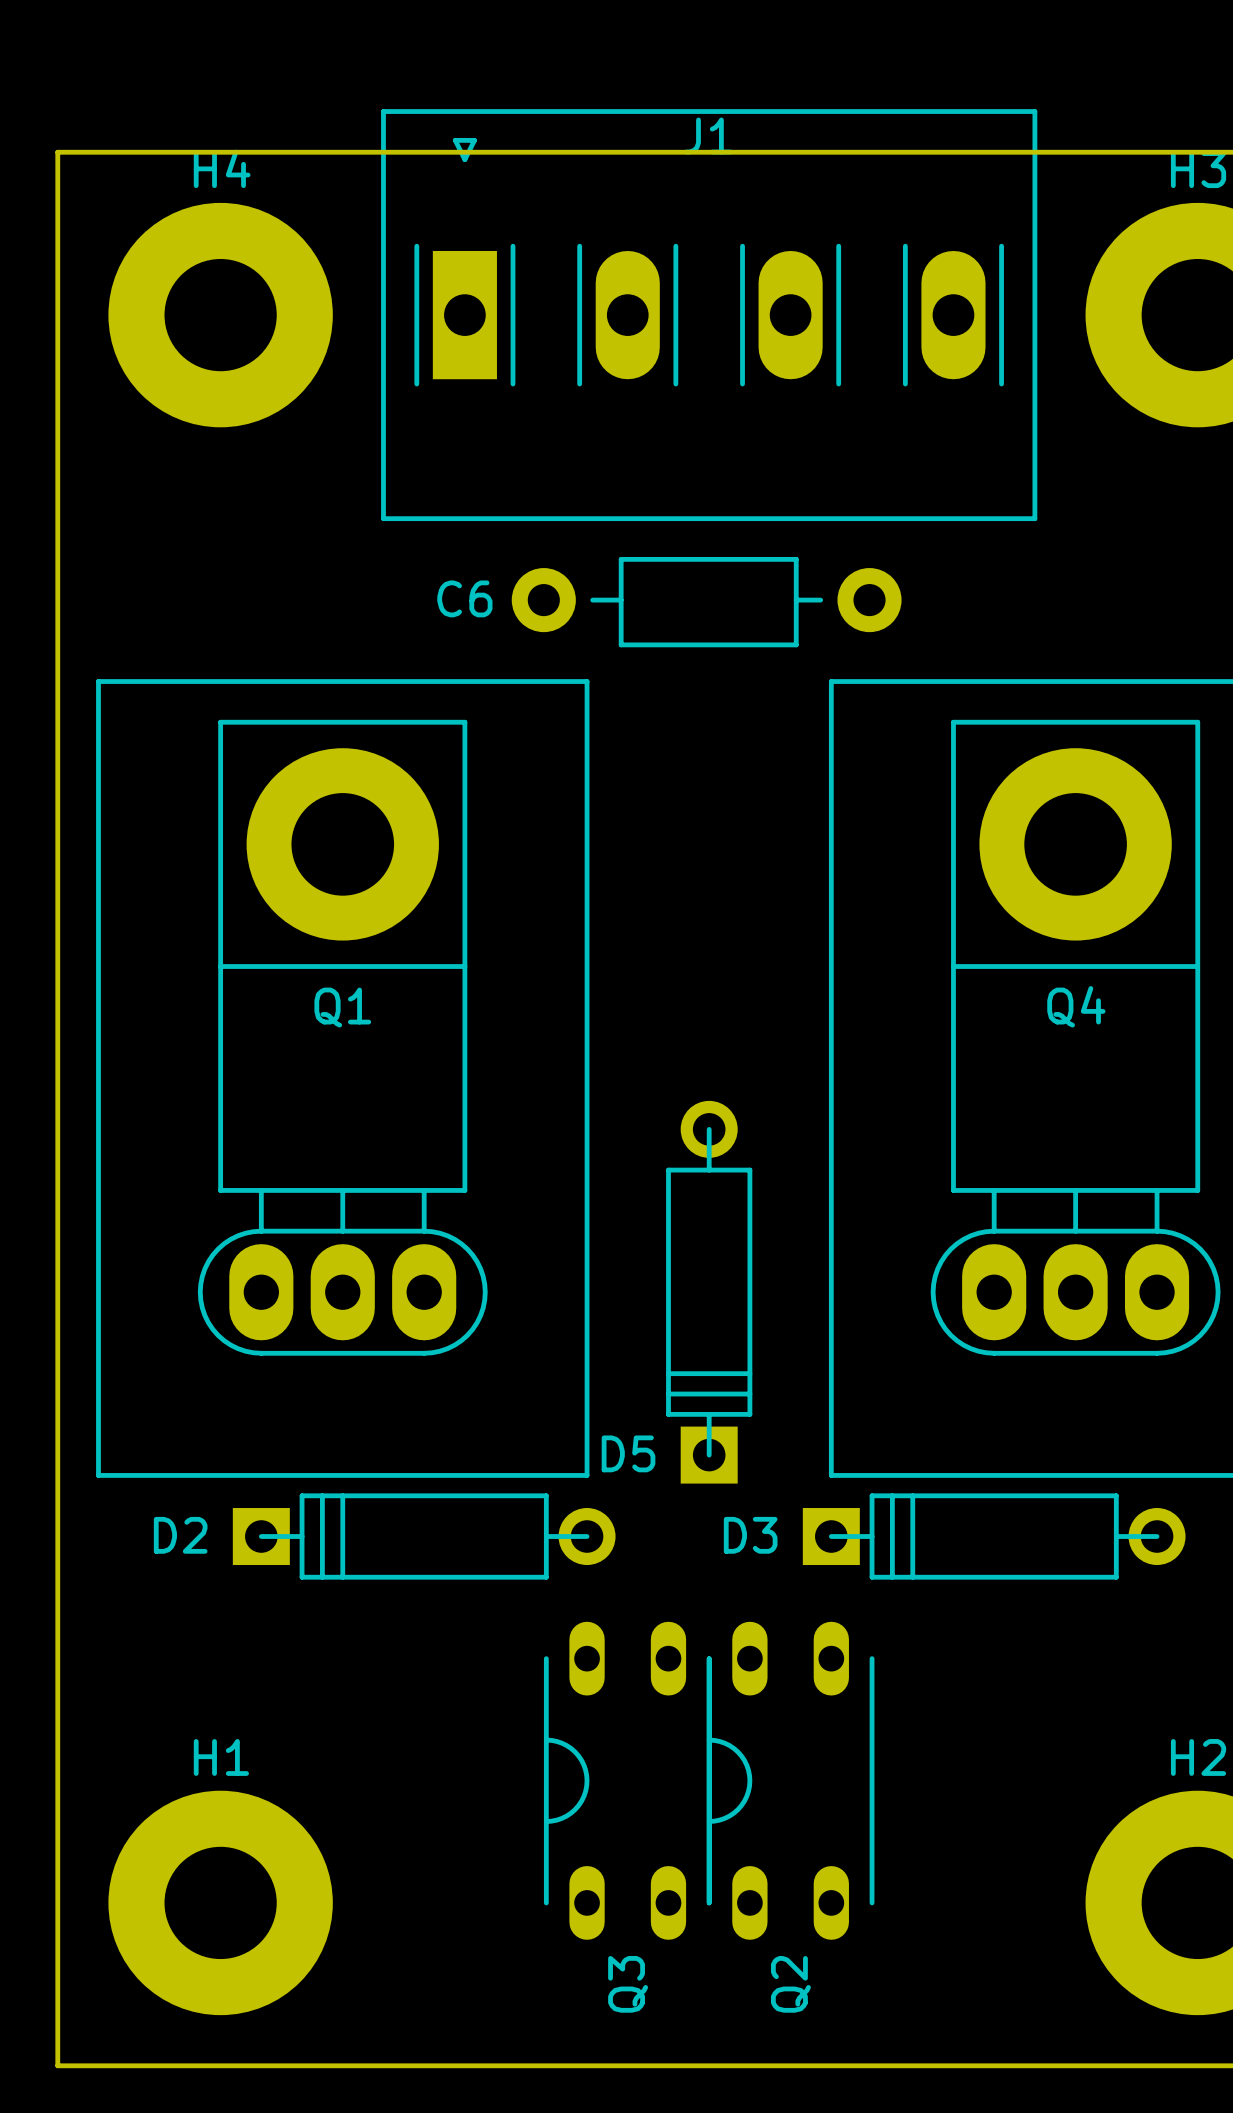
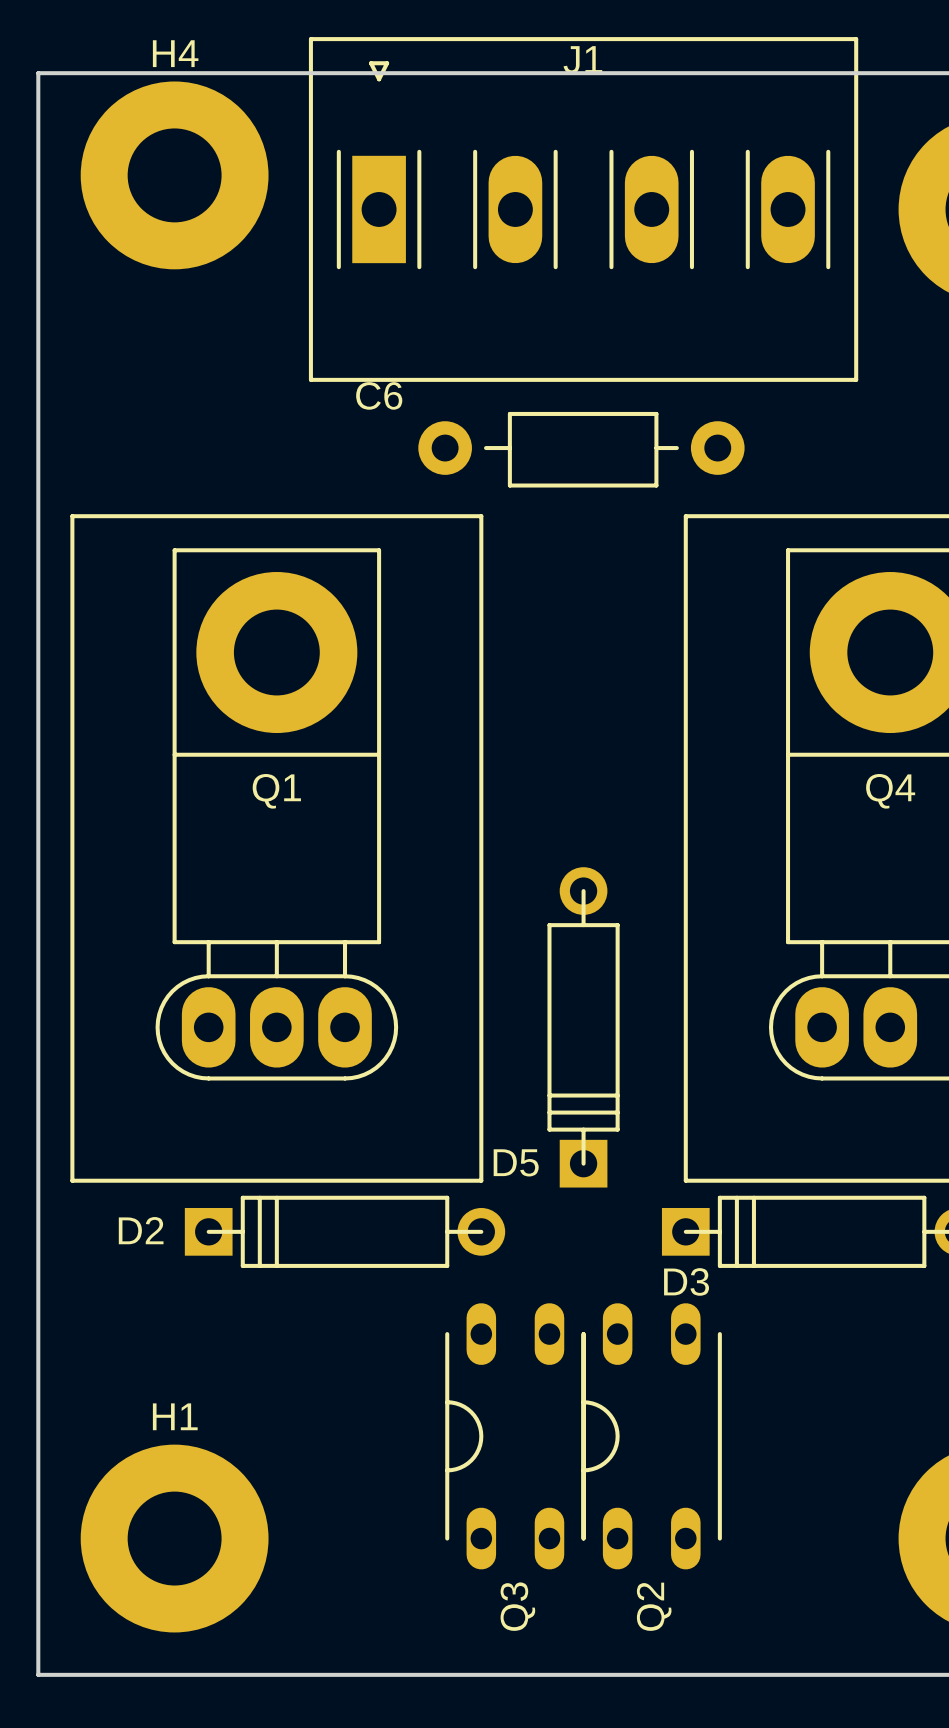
H4 position: (220, 315) -> (174, 175)
C6 name position: C6 (464, 598) -> C6 (379, 395)
D3 name position: D3 (750, 1535) -> D3 (686, 1281)

